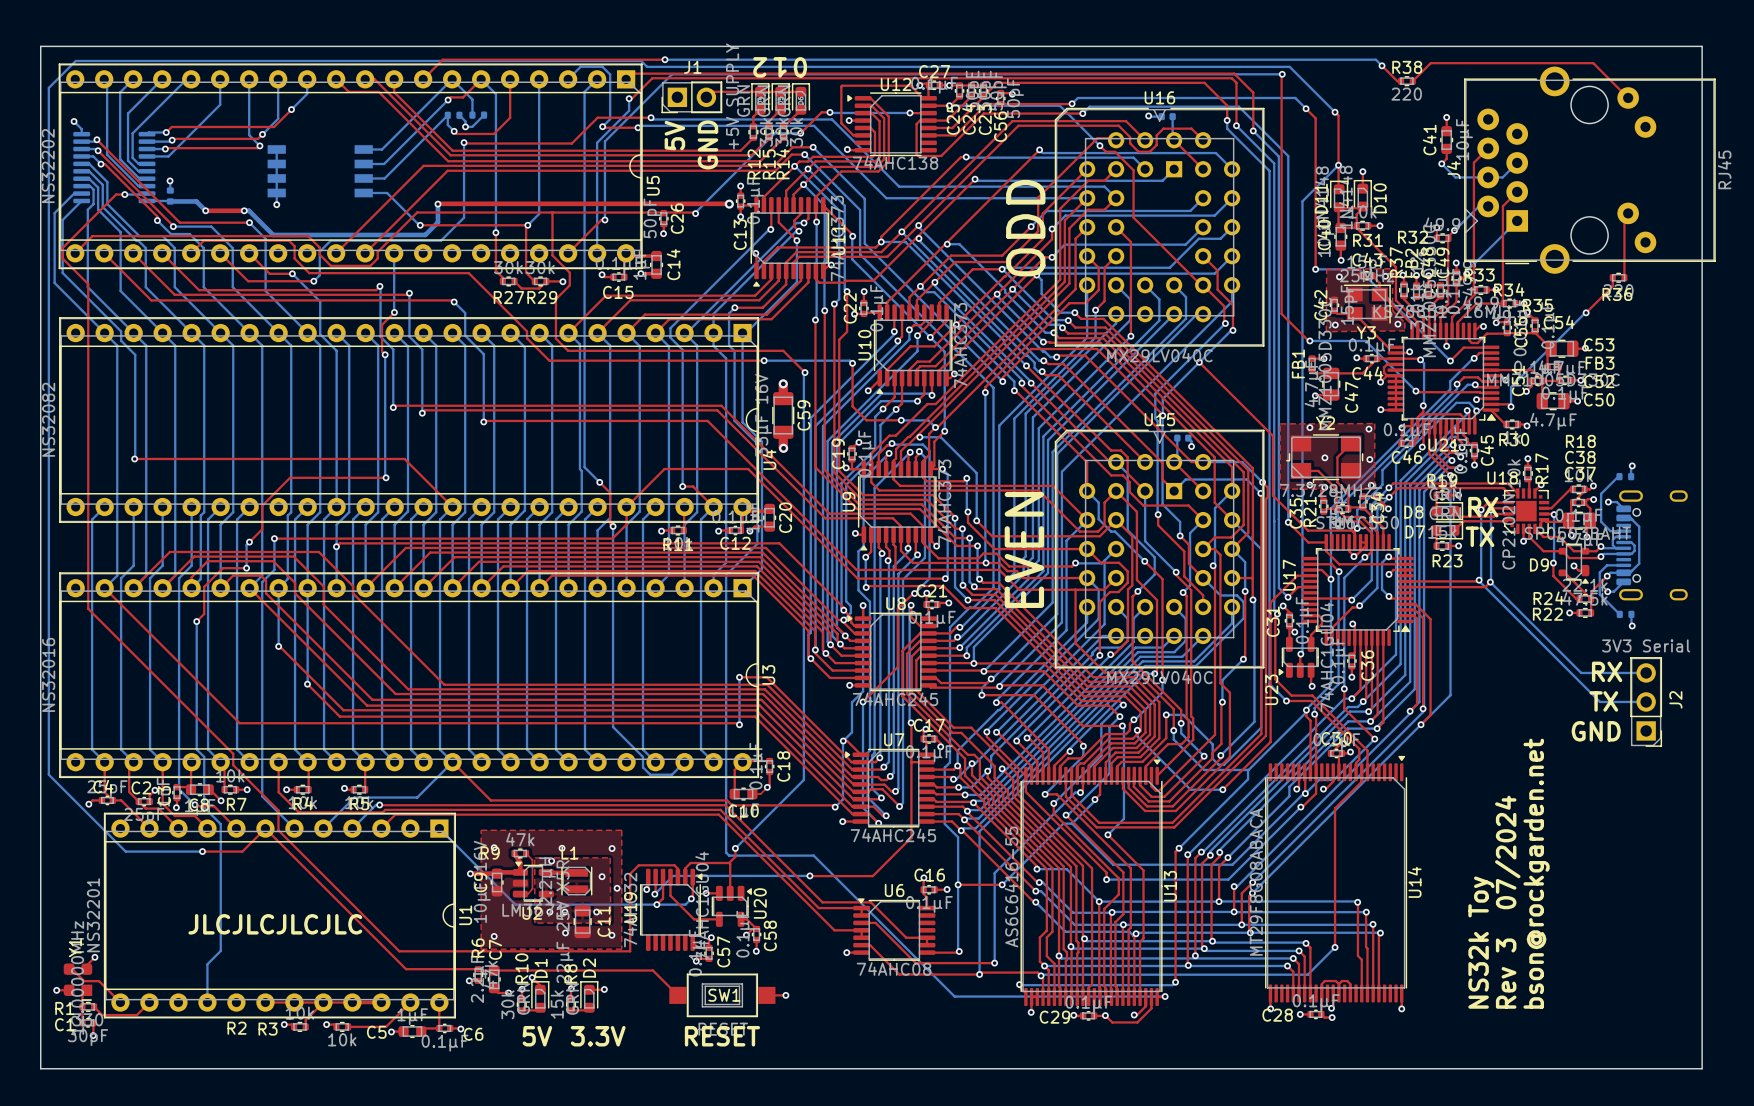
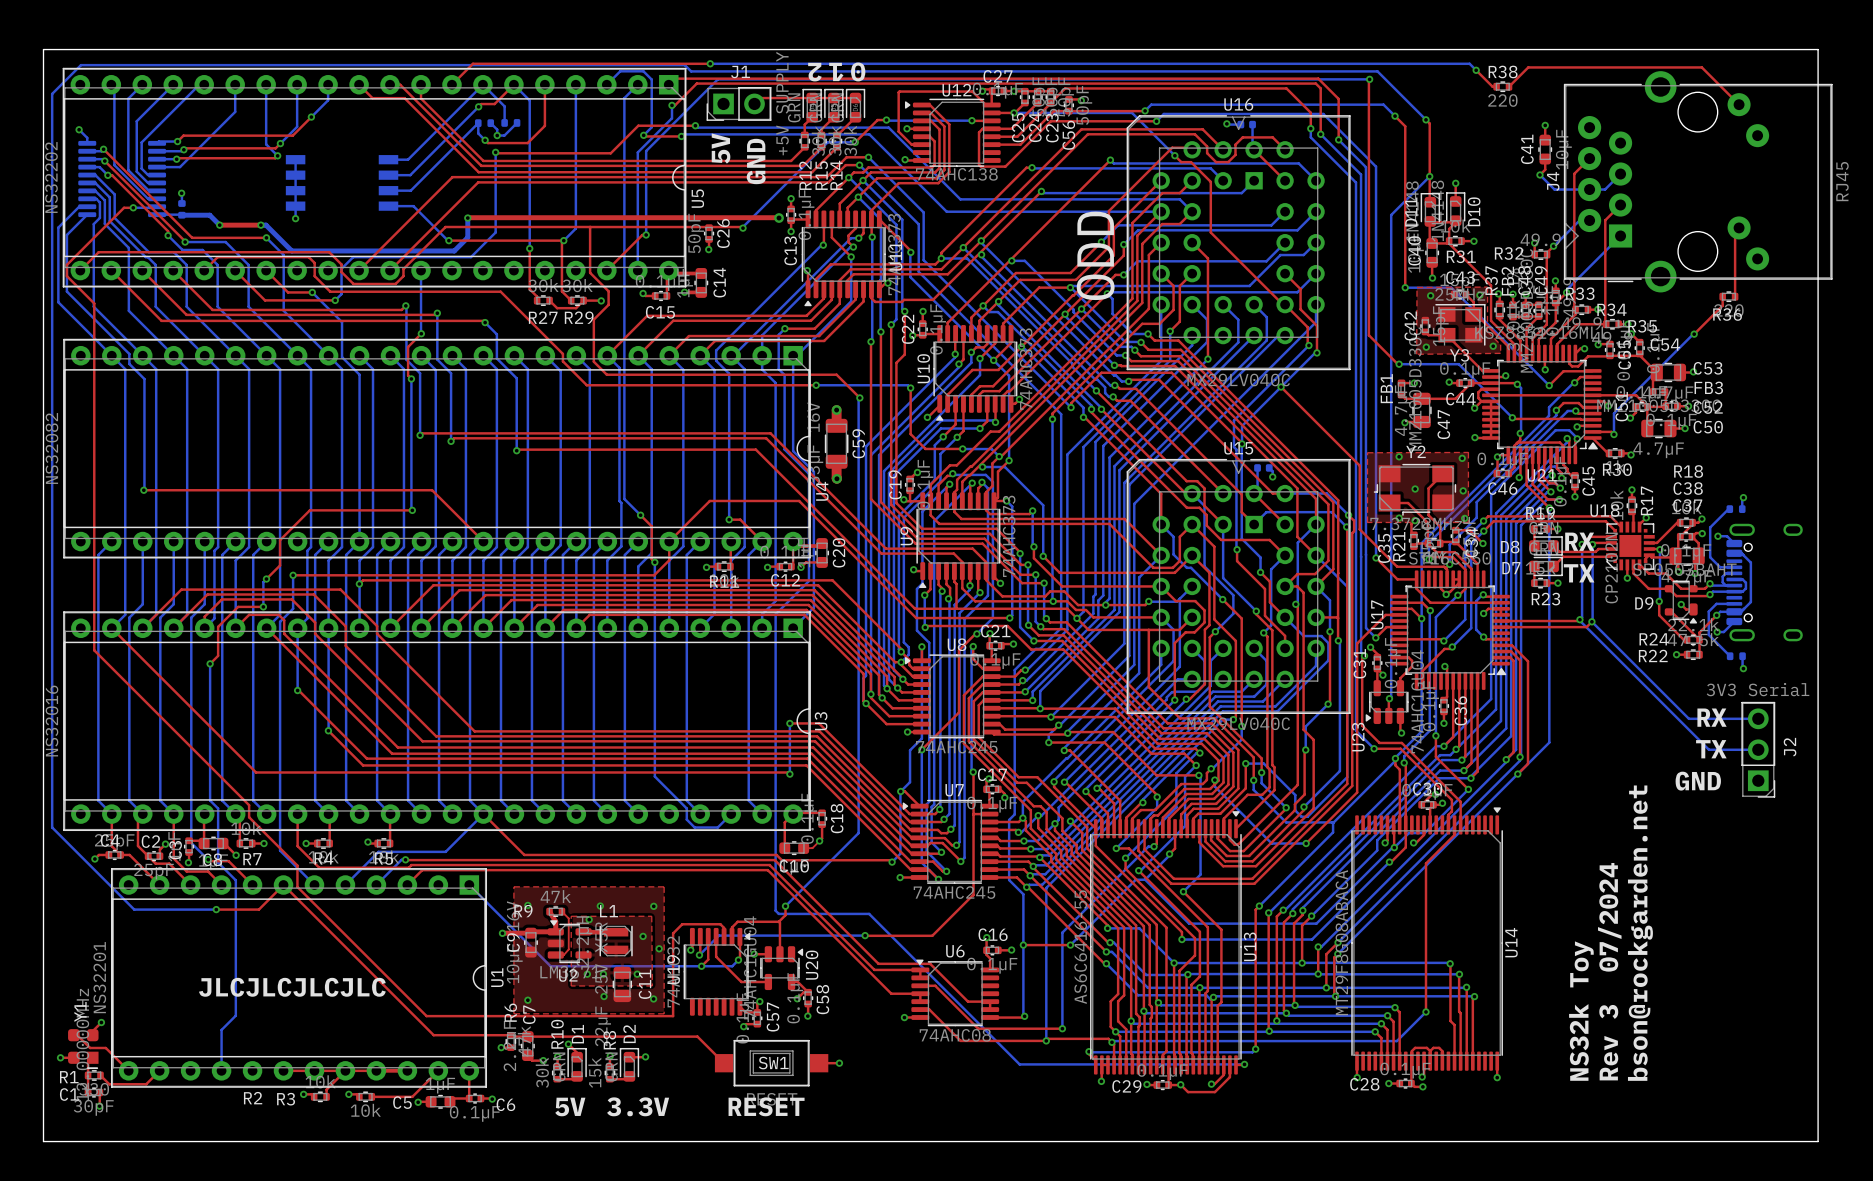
text: EVEN (1024, 549) -> none

